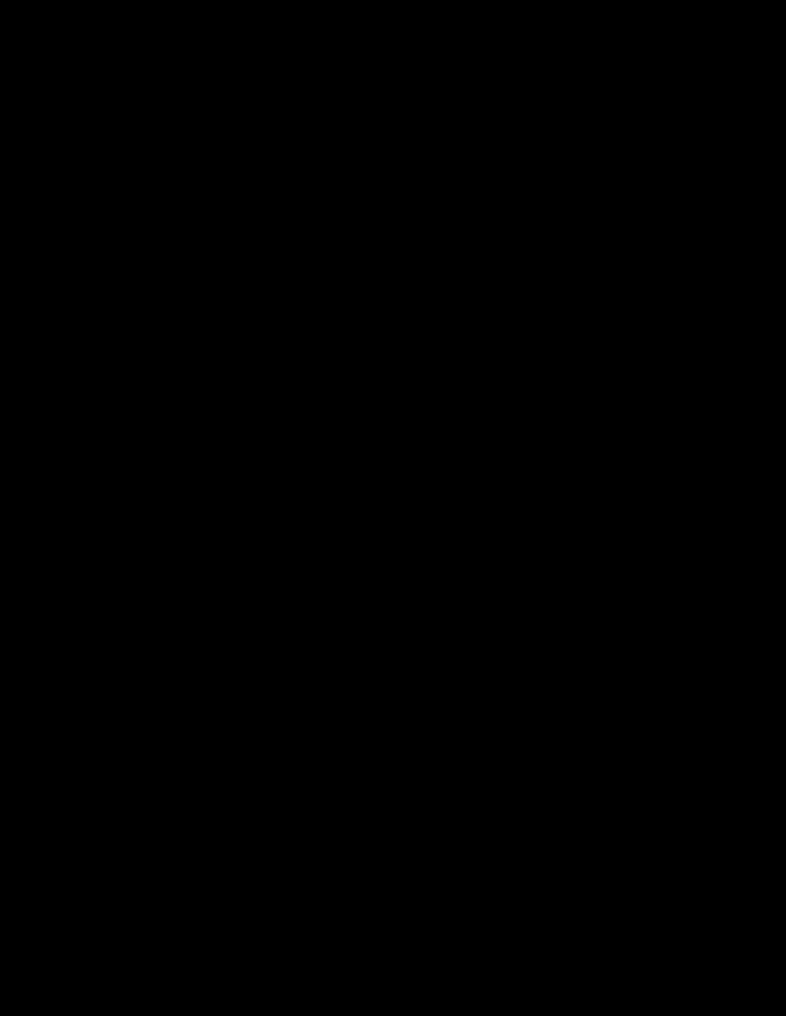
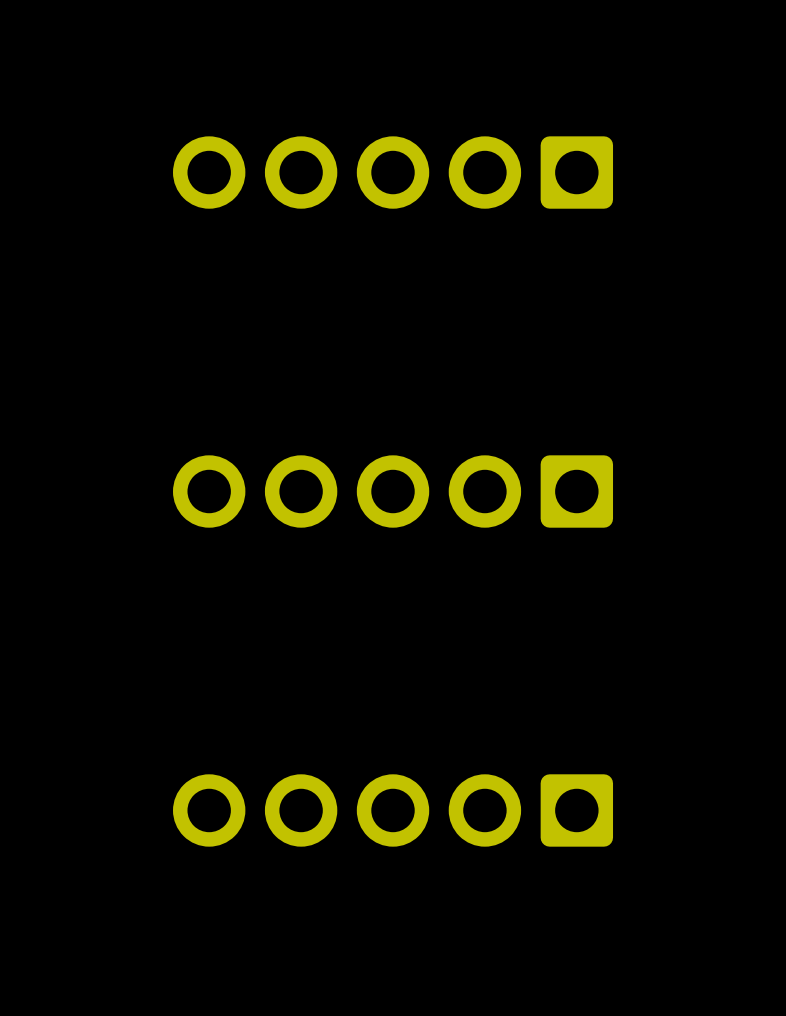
part: none -> (393, 172)
part: none -> (393, 491)
part: none -> (393, 810)

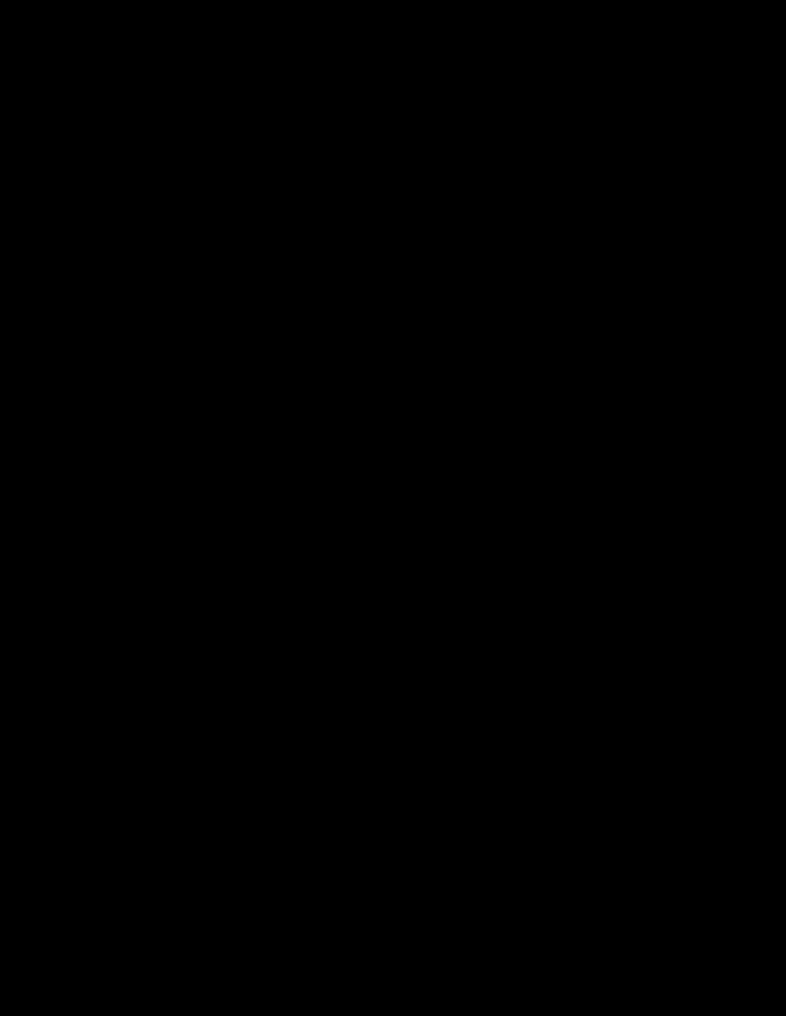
part: (393, 172) -> none
part: (393, 491) -> none
part: (393, 810) -> none

